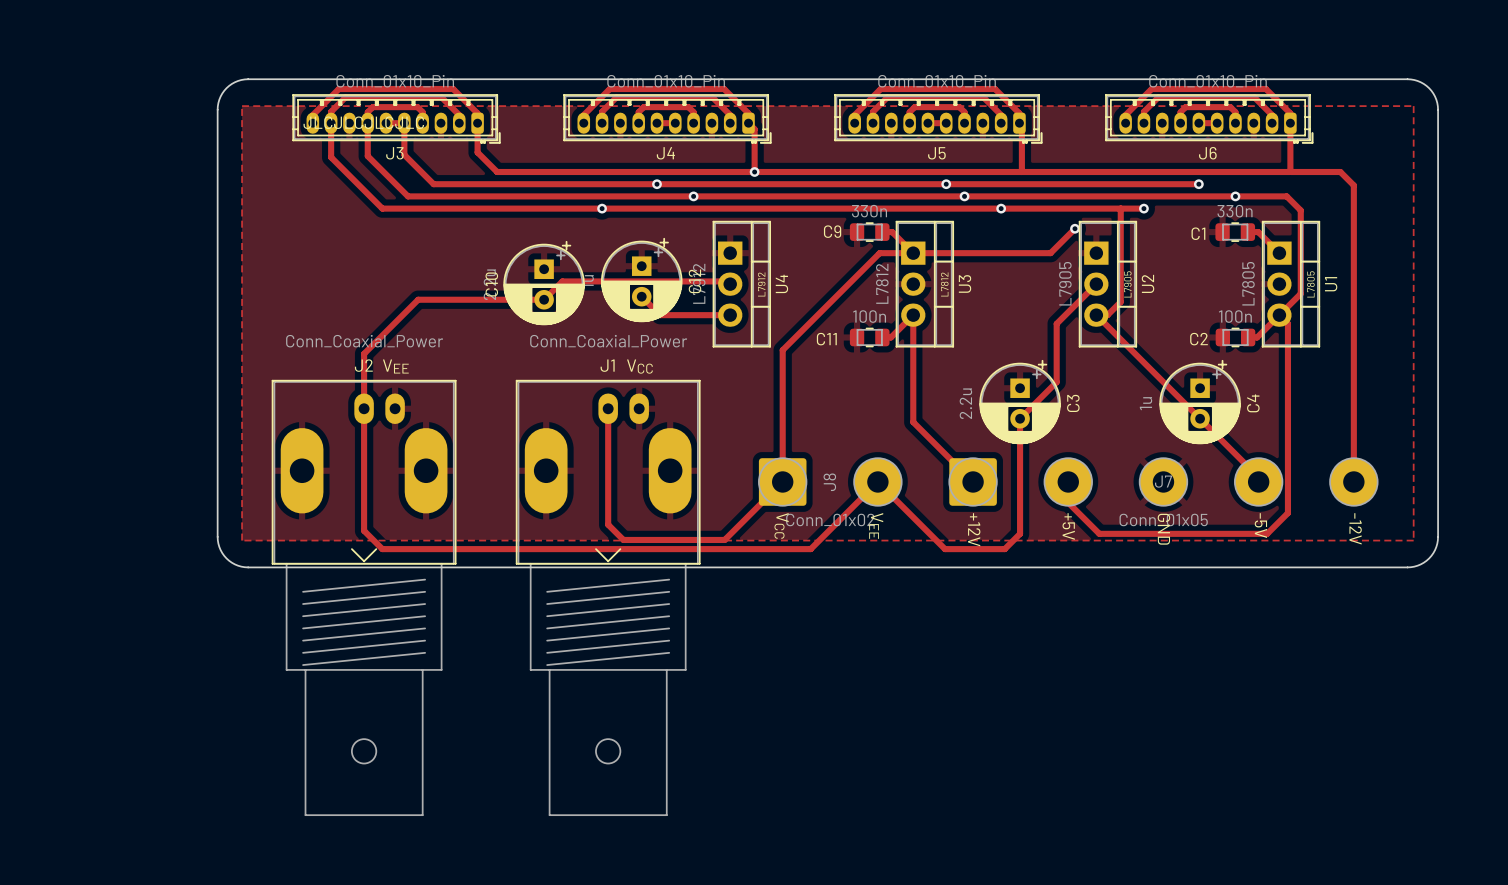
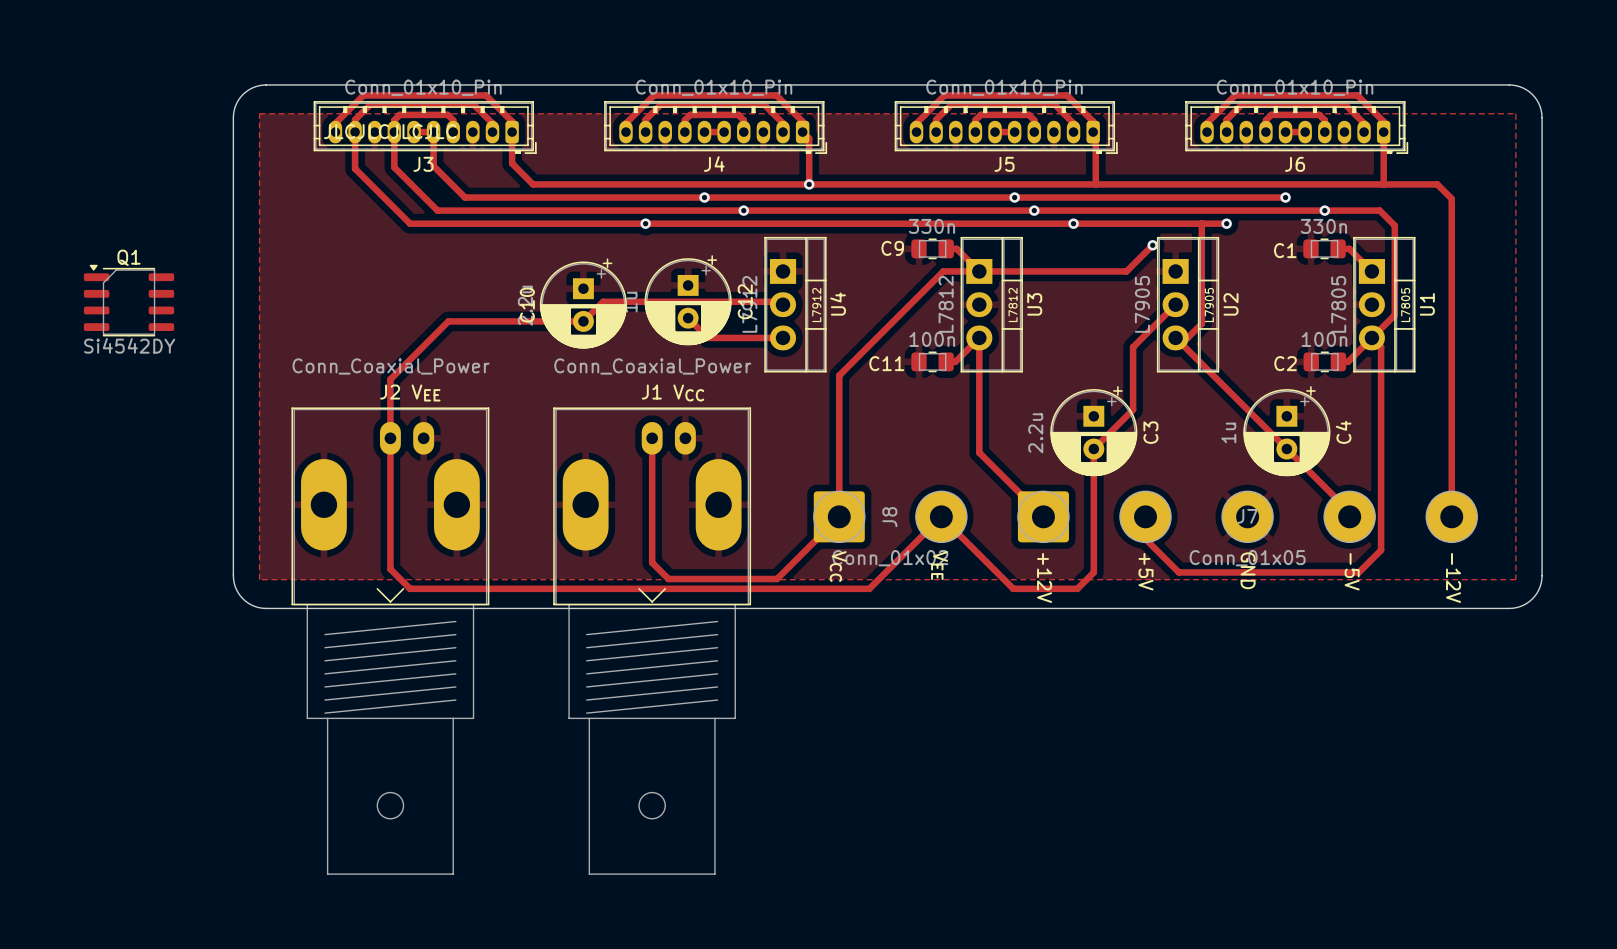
Q1: none -> Si4542DY (129, 300)

